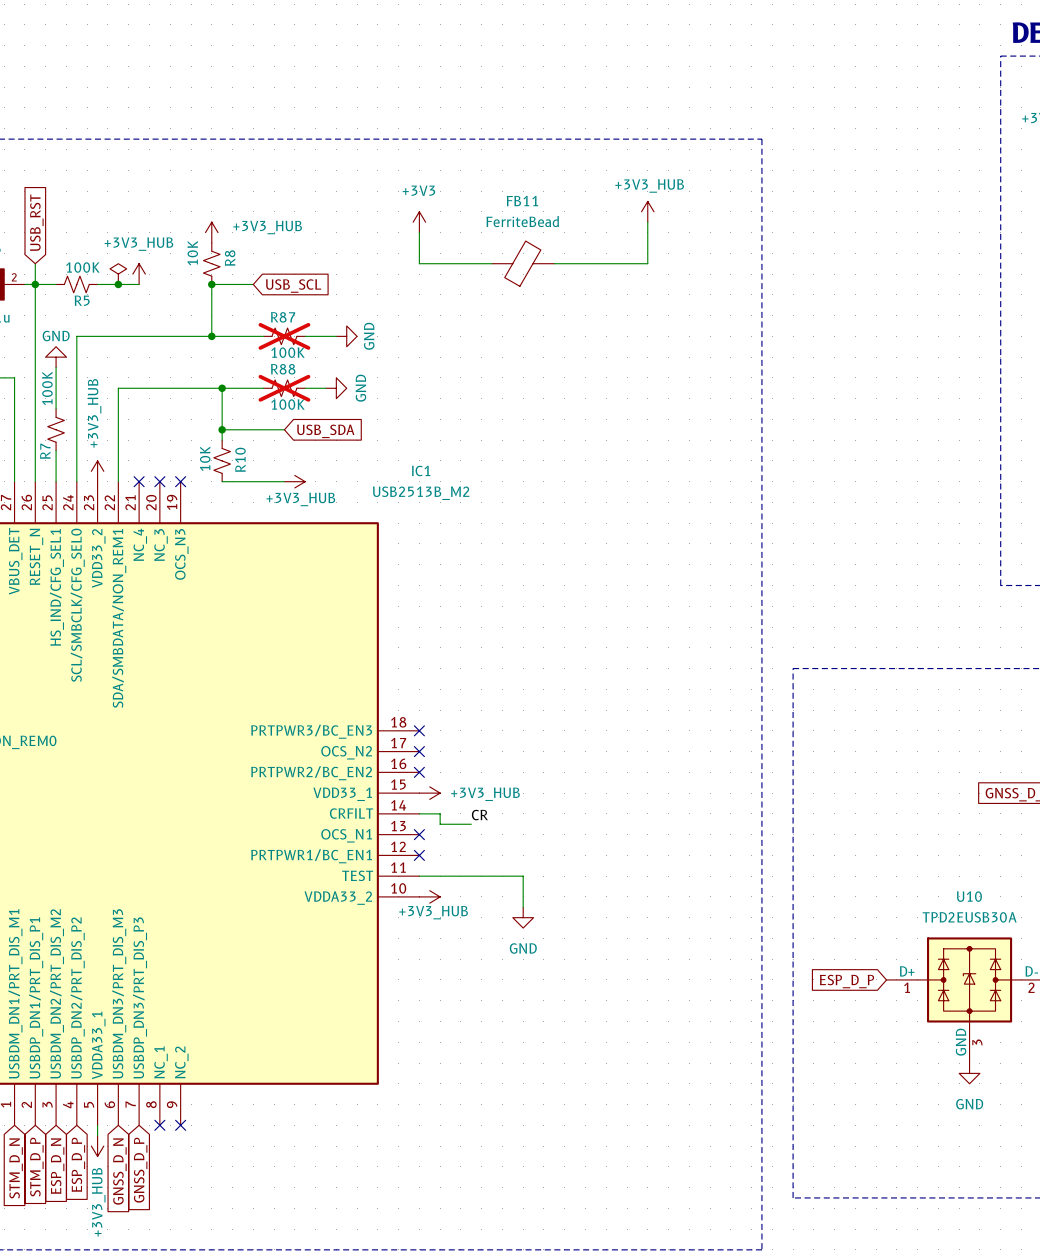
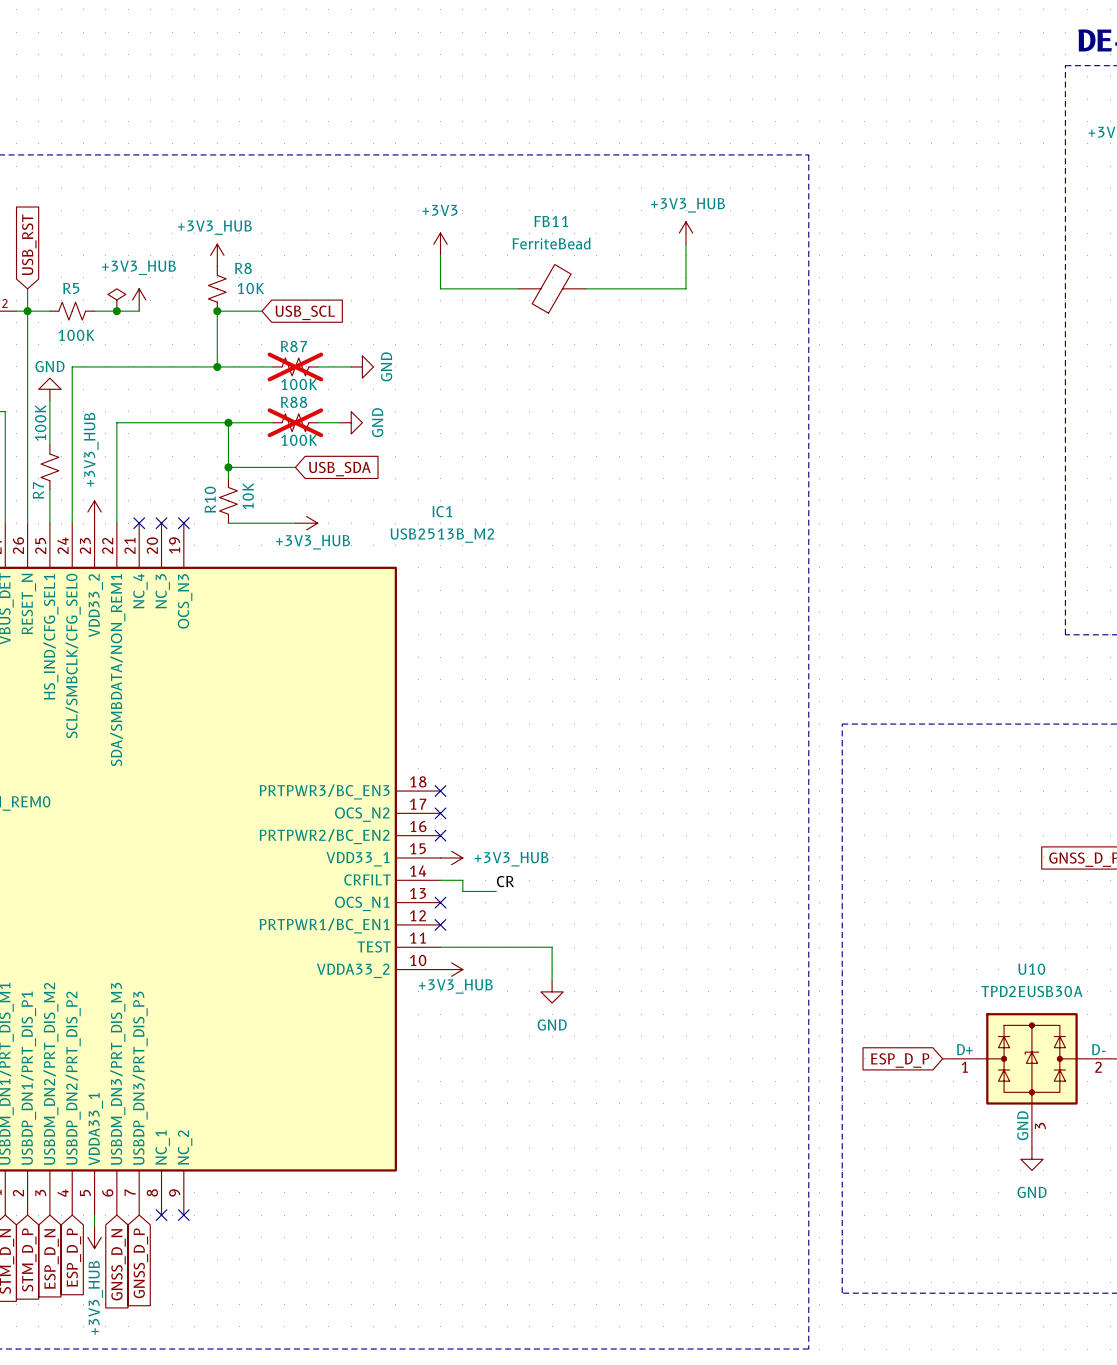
power symbol text position: +3V3_HUB (267, 227) -> +3V3_HUB (214, 227)
R8 value rotation: 0° (192, 253) -> 90° clockwise (250, 288)
R8 value position: 10K (192, 253) -> 10K (250, 288)
R8 name rotation: 0° (230, 258) -> 90° clockwise (243, 268)
R5 value position: 100K (82, 267) -> 100K (76, 335)
R5 name position: R5 (82, 300) -> R5 (71, 288)
R10 value position: 10K (205, 458) -> 10K (248, 496)
R10 name position: R10 (240, 459) -> R10 (210, 499)

